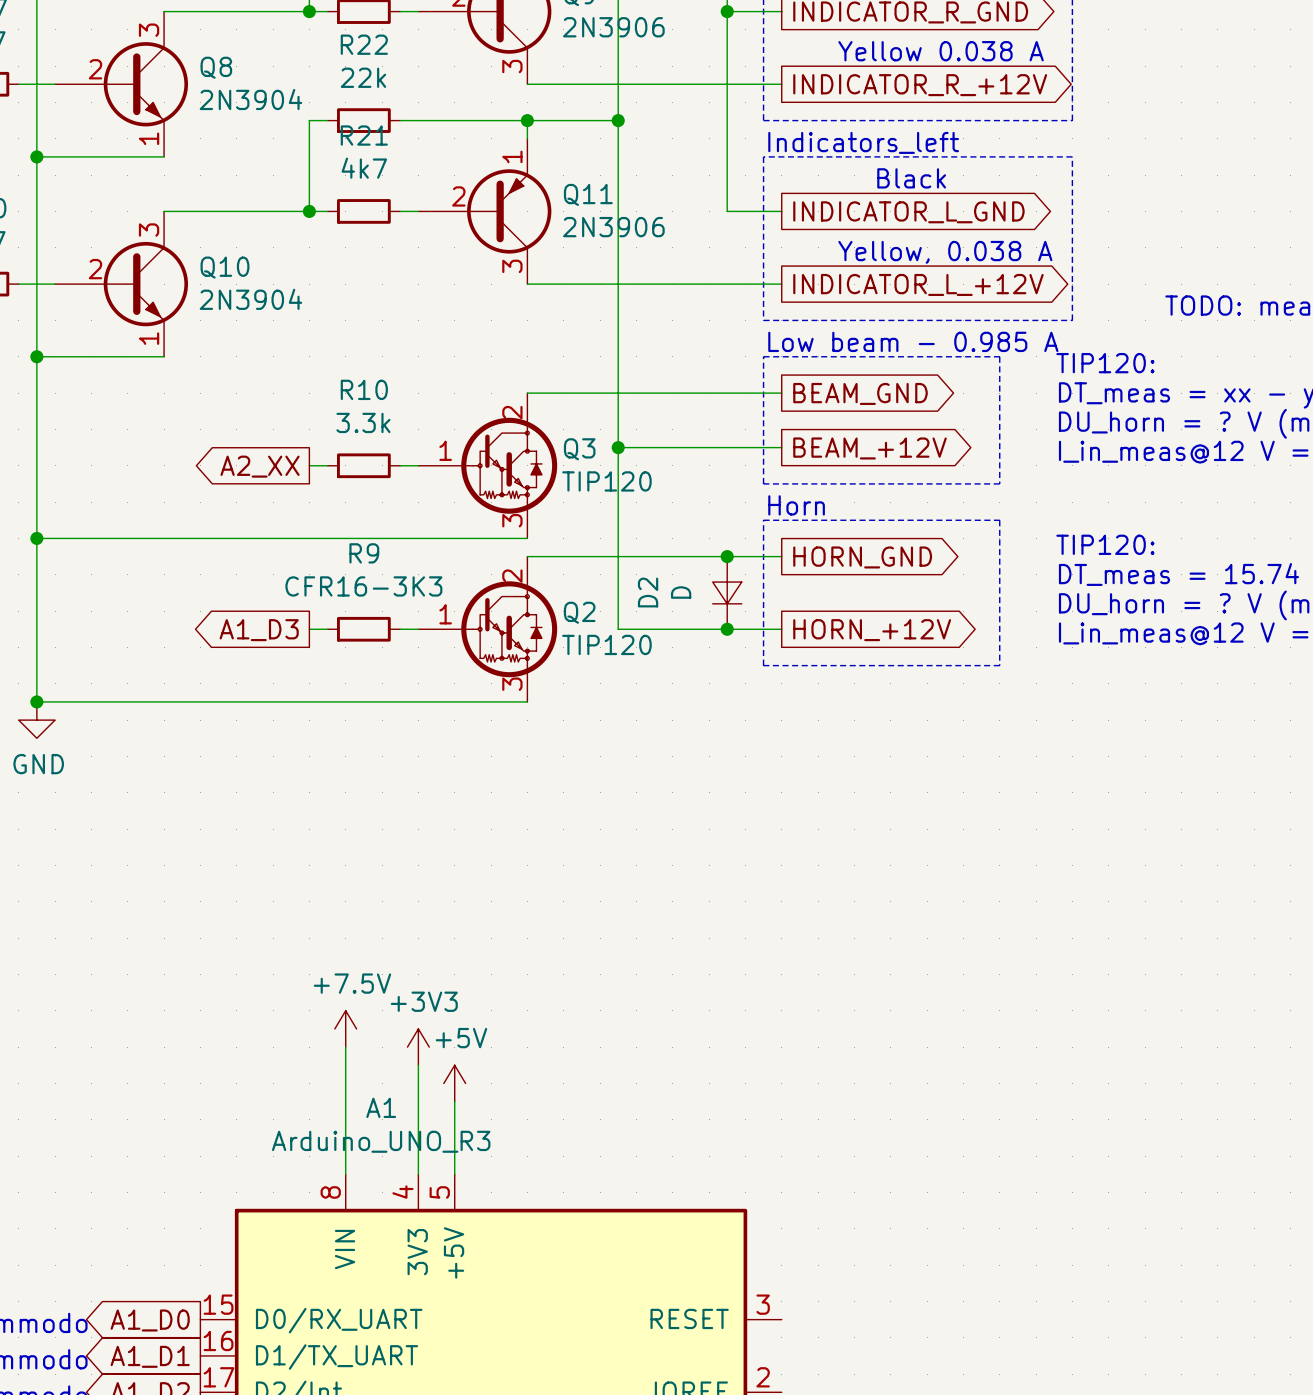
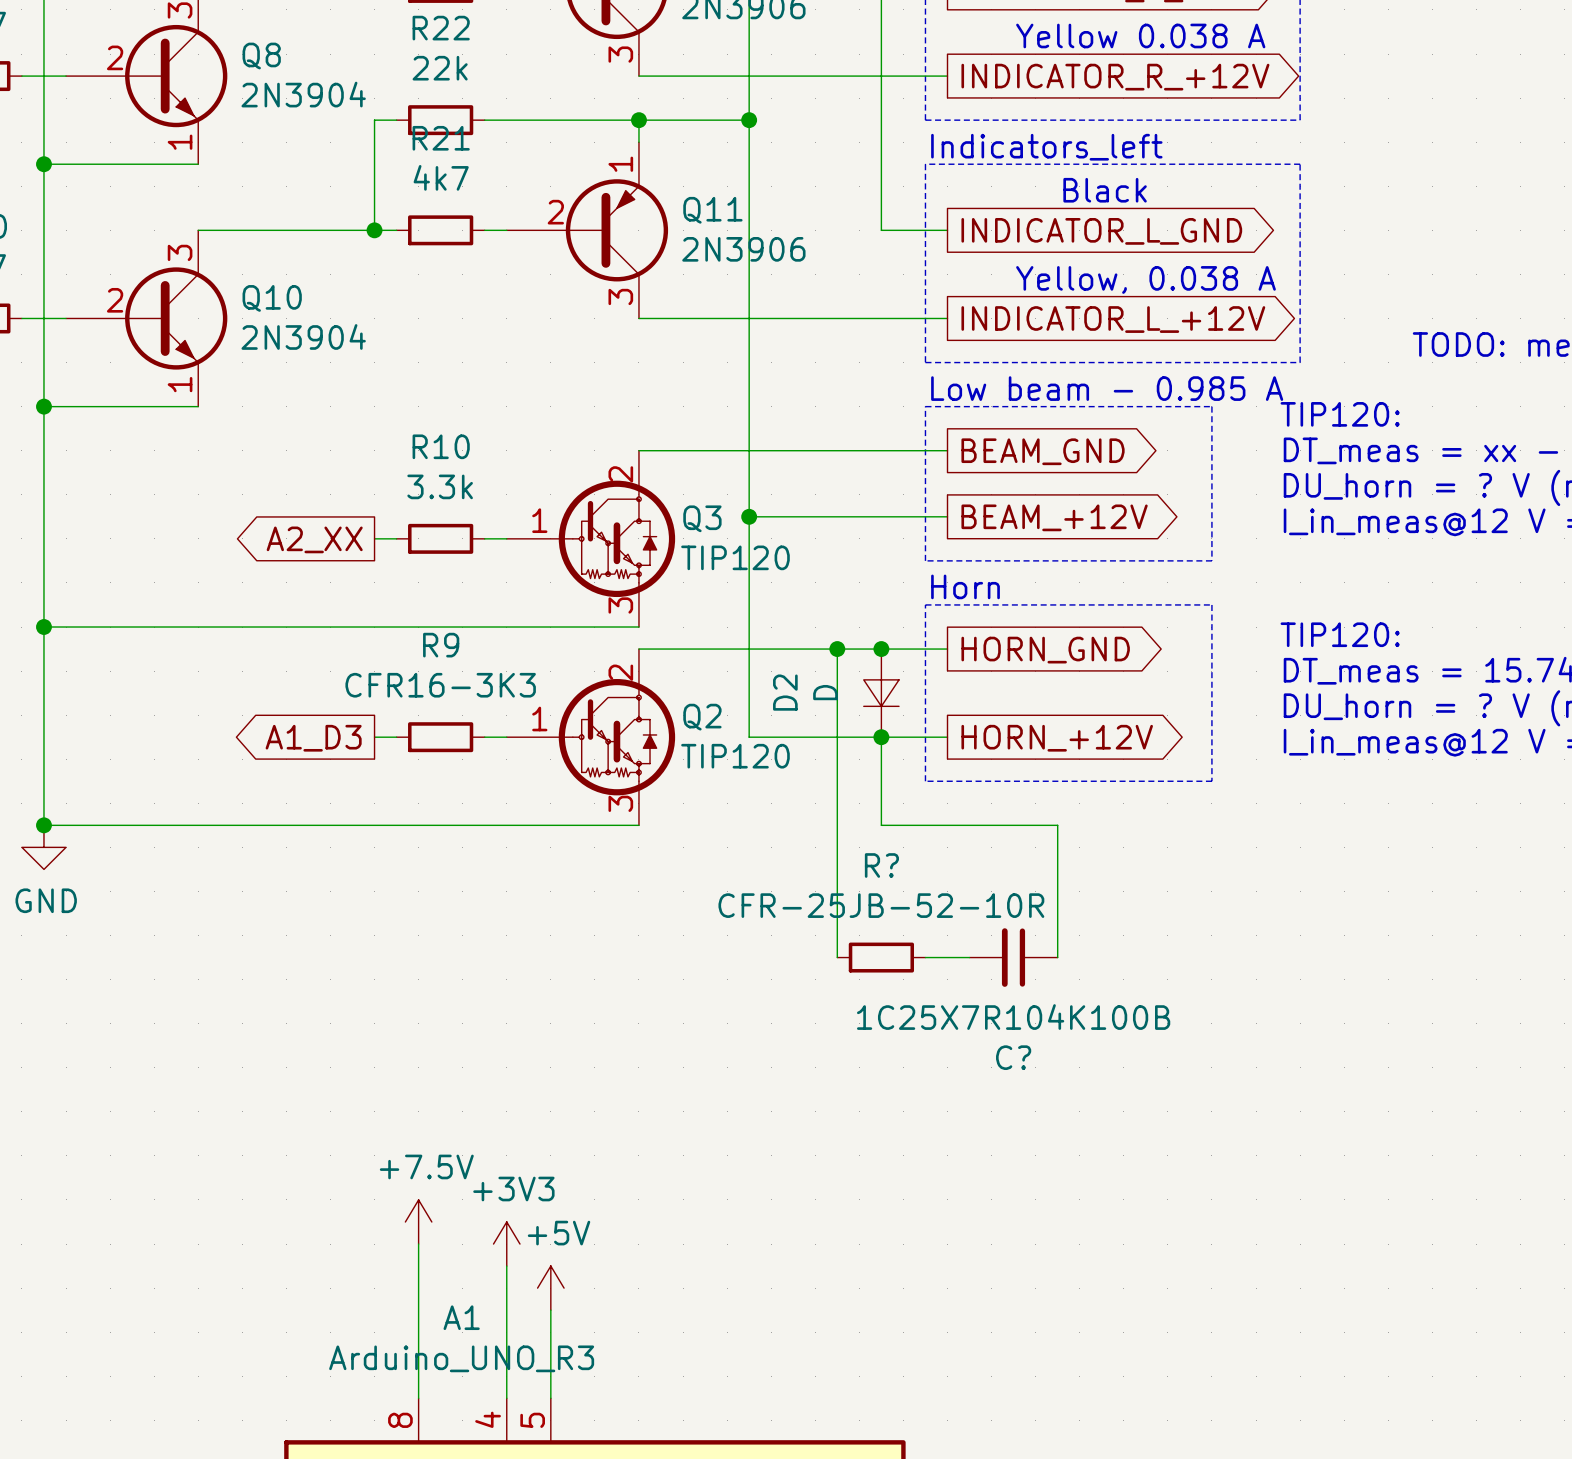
wire: none -> (837, 649) (837, 957)
junction: none -> (837, 649)
wire: none -> (881, 737) (881, 825) (1057, 825) (1057, 957)
R?: none -> CFR-25JB-52-10R (881, 957)
wire: none -> (925, 957) (969, 957)
C?: none -> 1C25X7R104K100B (1013, 957)

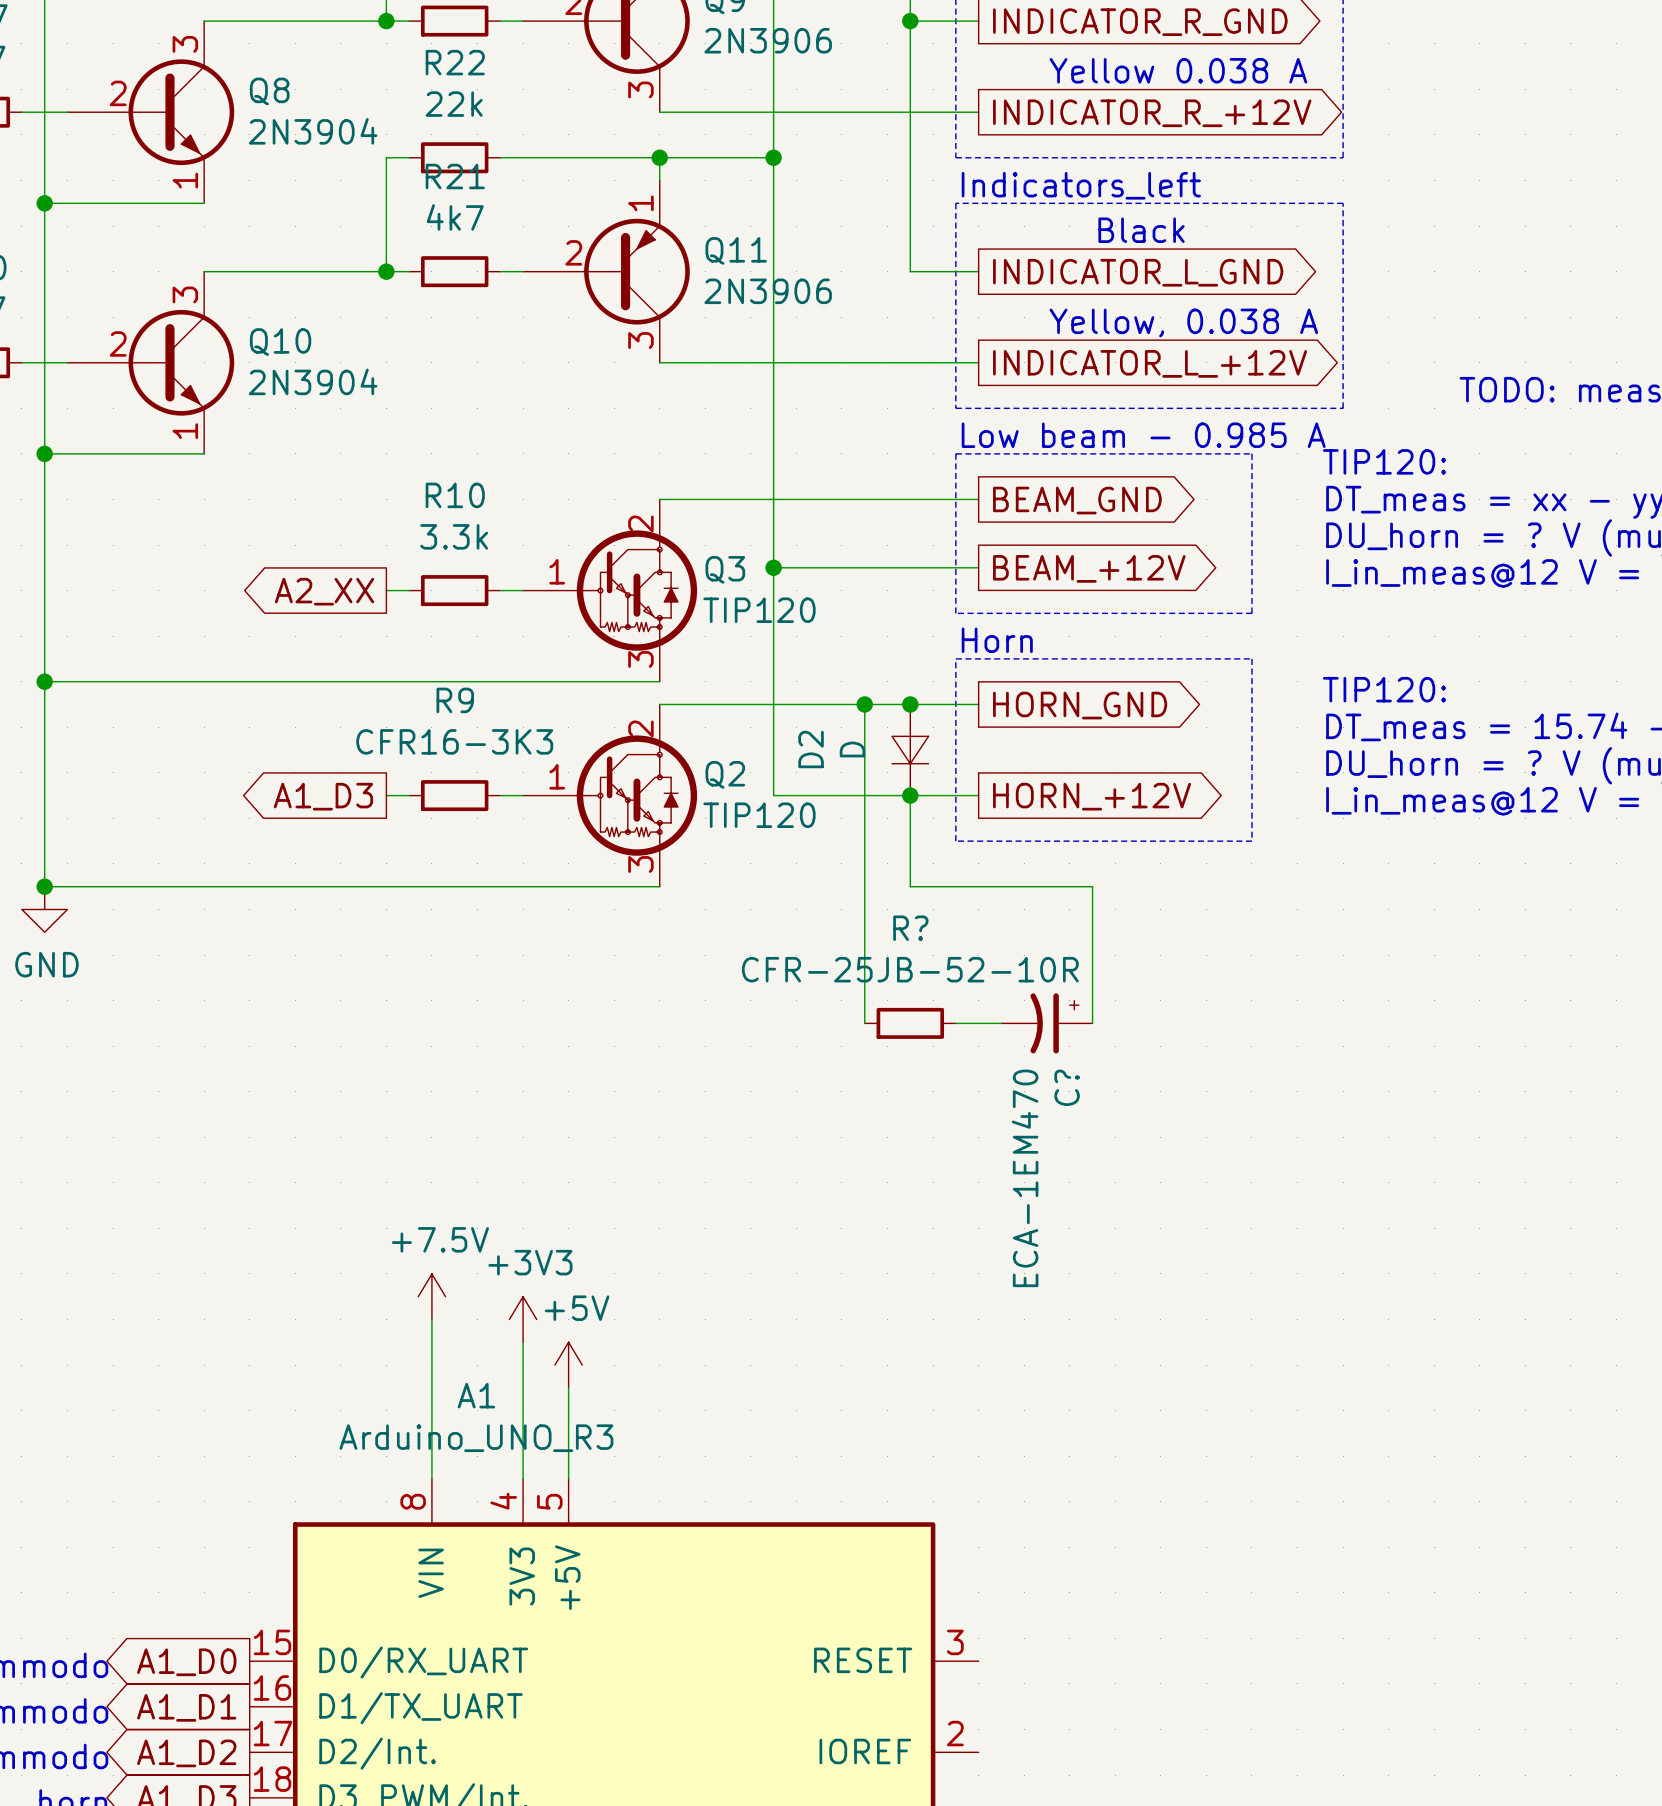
C? symbol: [969, 928, 1058, 987] -> [1001, 993, 1093, 1054]
C? value: 1C25X7R104K100B (1013, 1017) -> ECA-1EM470 (1025, 1178)
C? name position: C? (1013, 1057) -> C? (1067, 1087)

